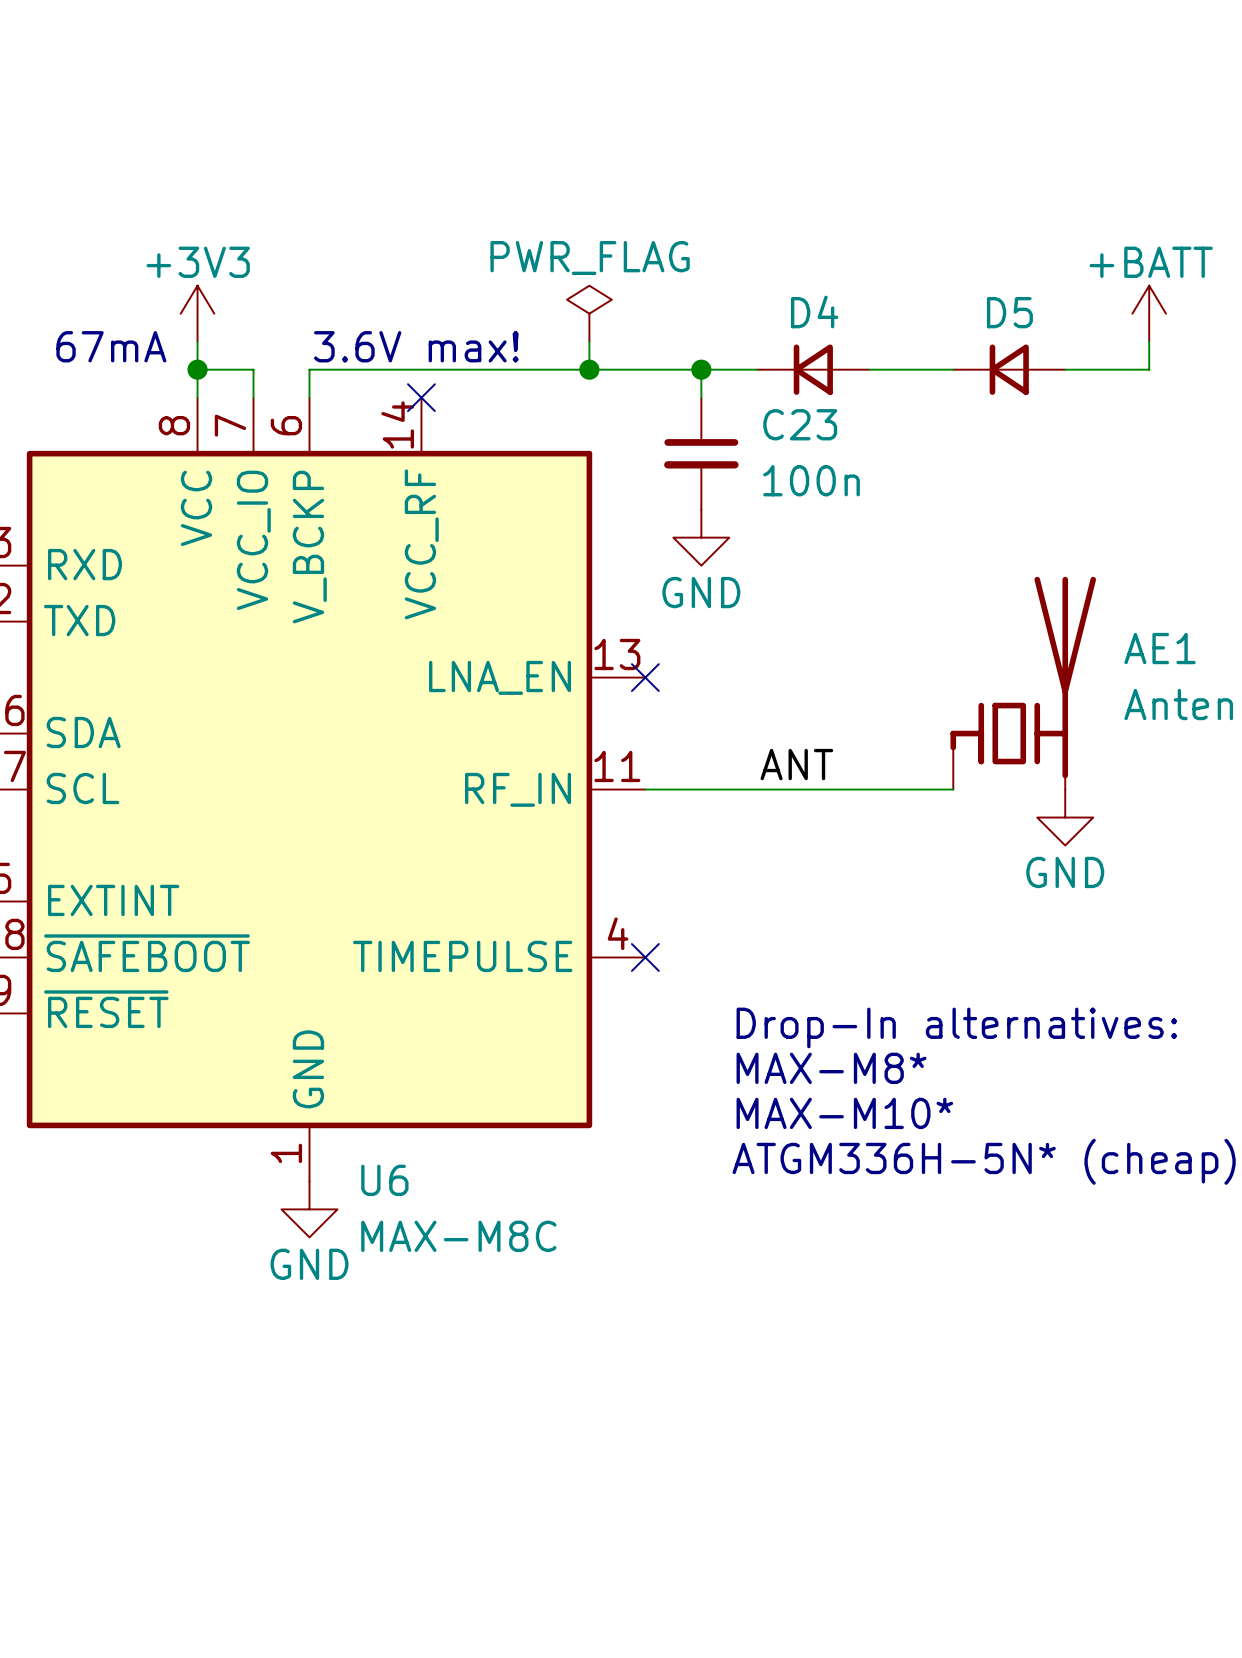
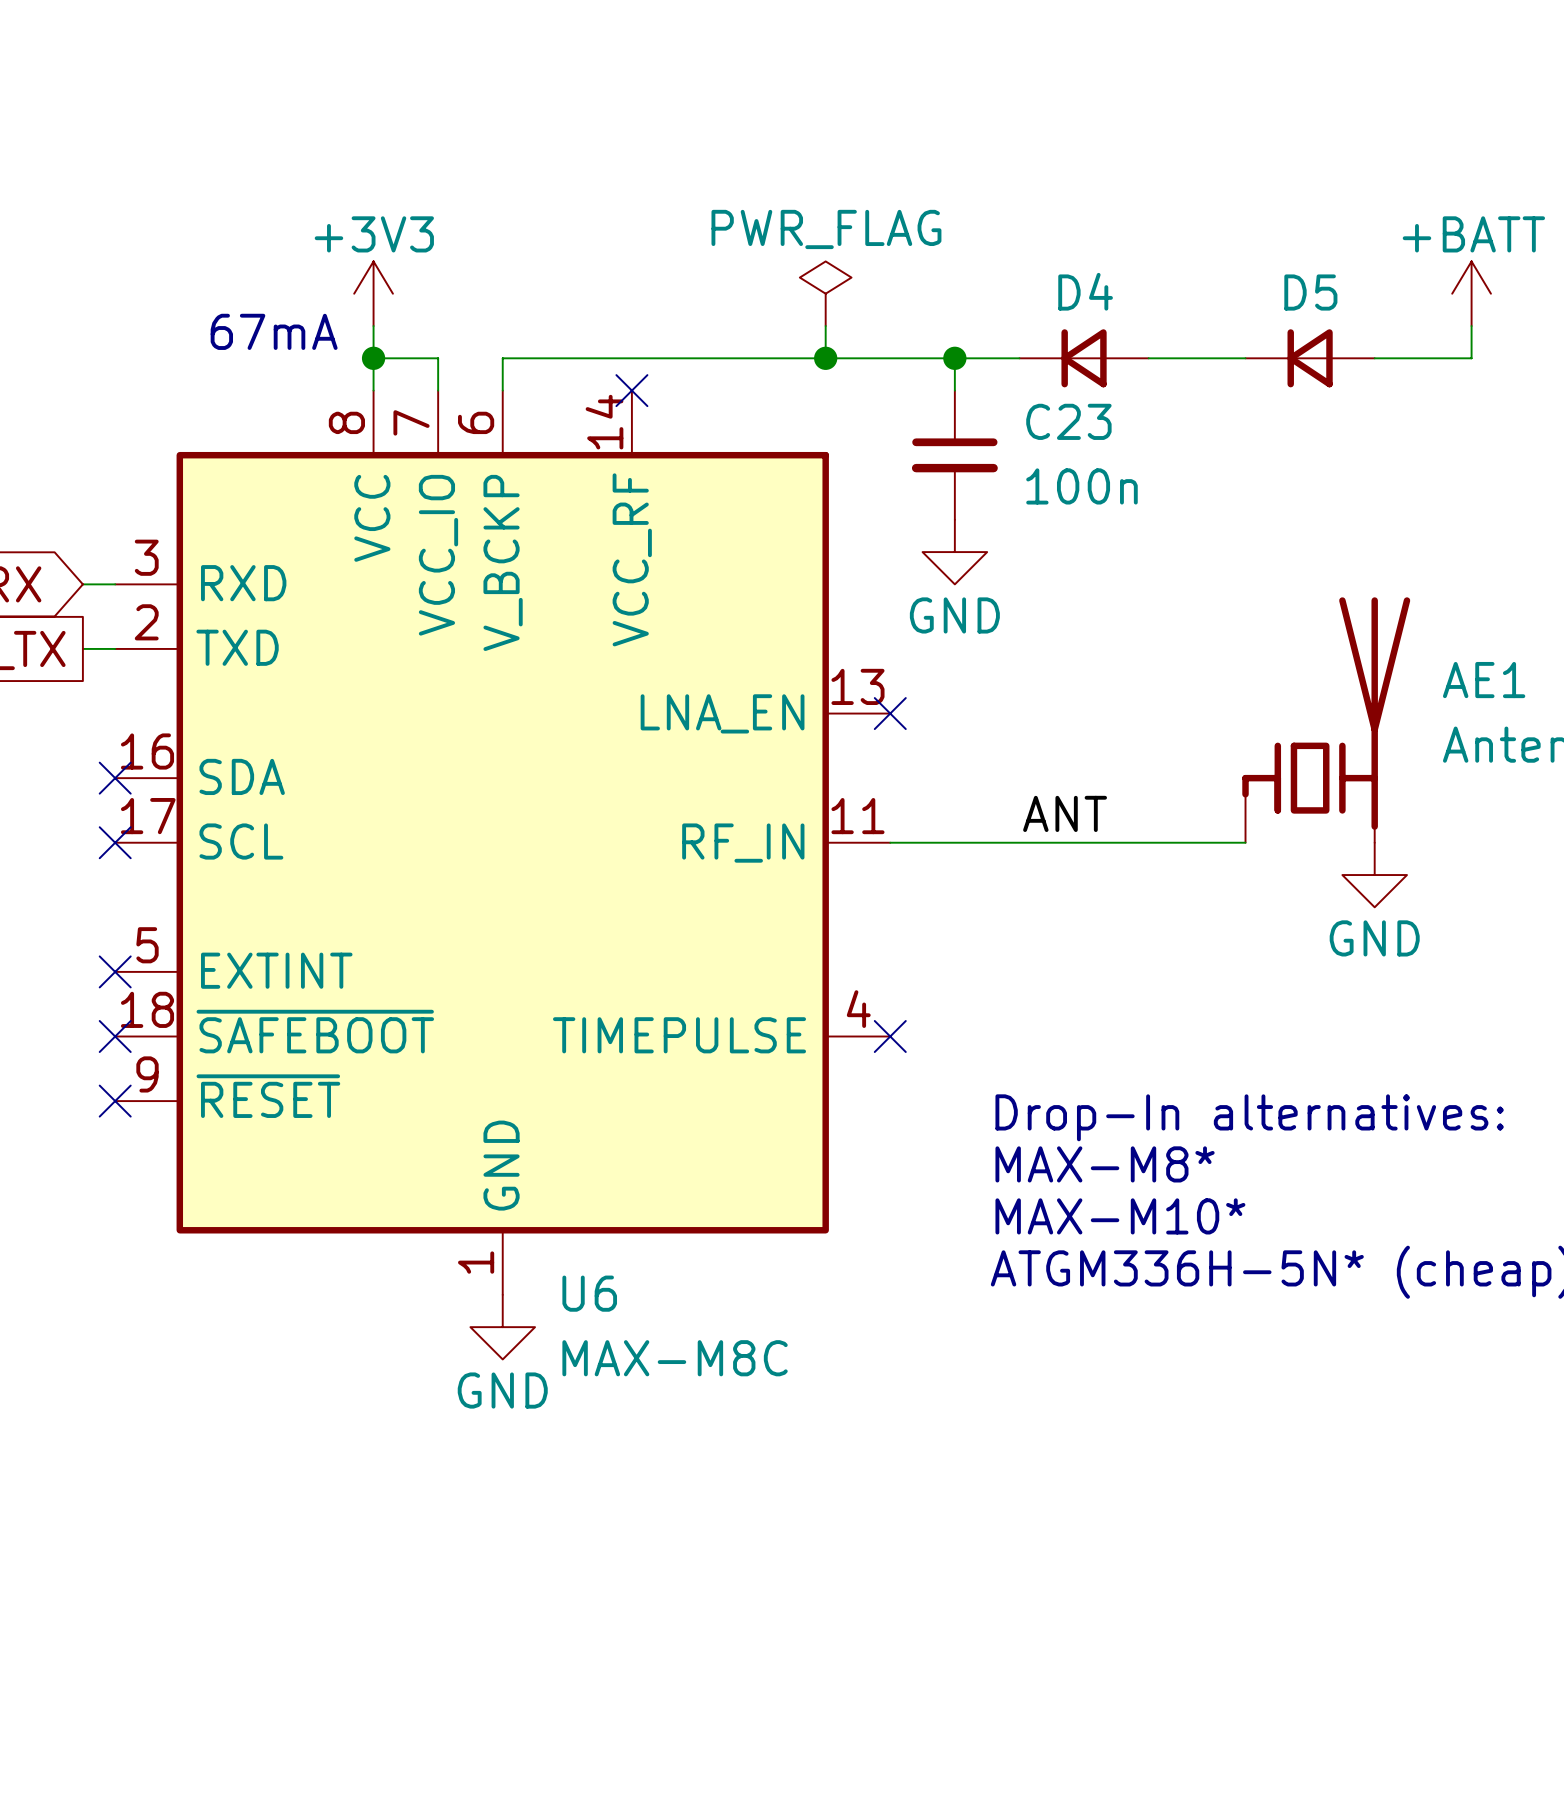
text: 3.6V max! (416, 346) -> none

